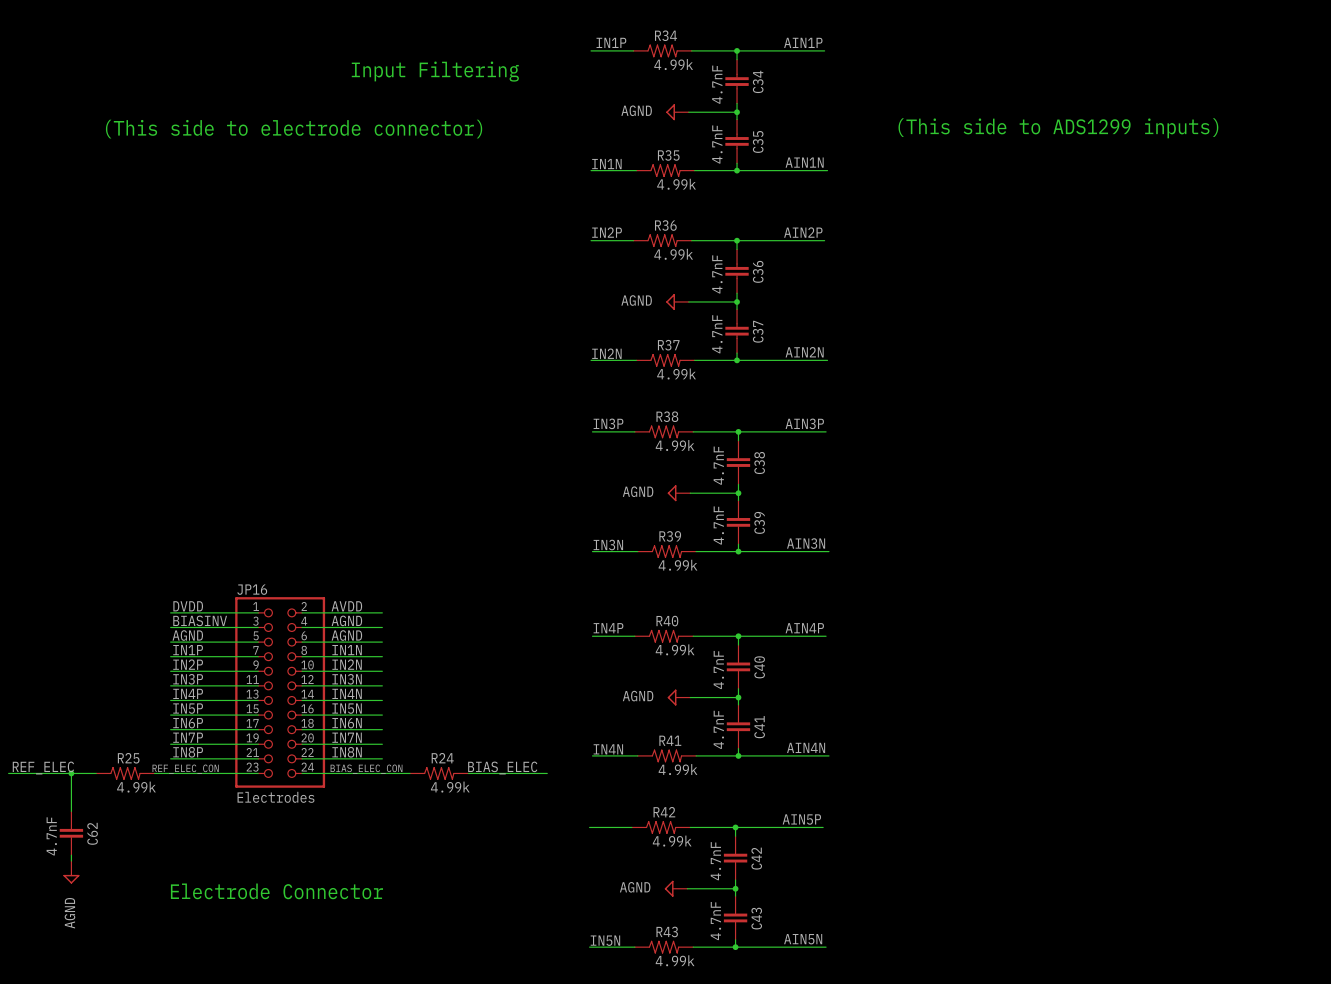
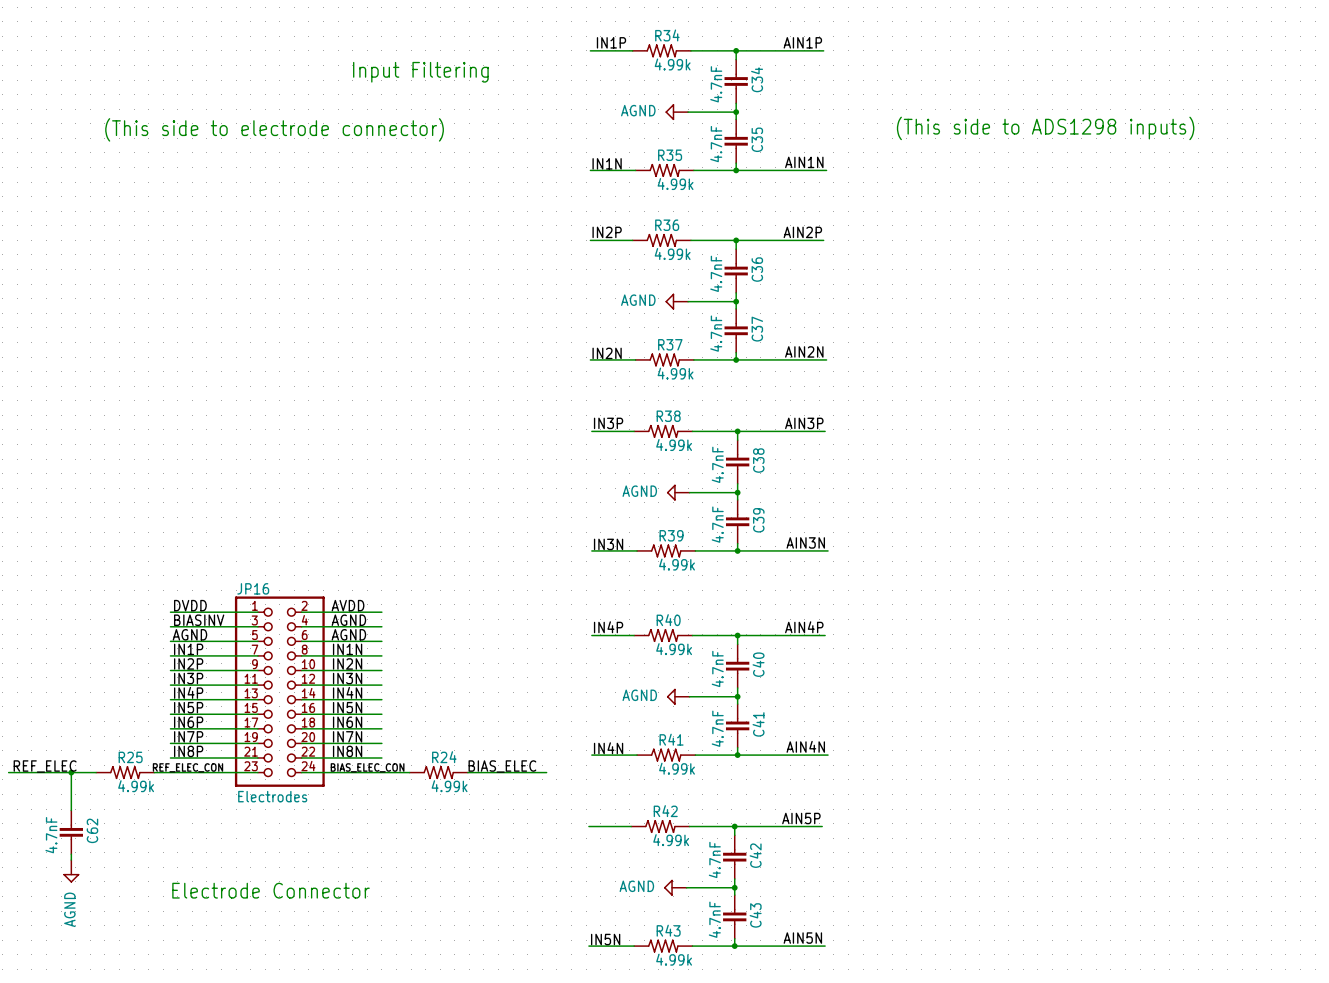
text: (This side to ADS1299 inputs) (1058, 128) -> (This side to ADS1298 inputs) (1045, 128)

